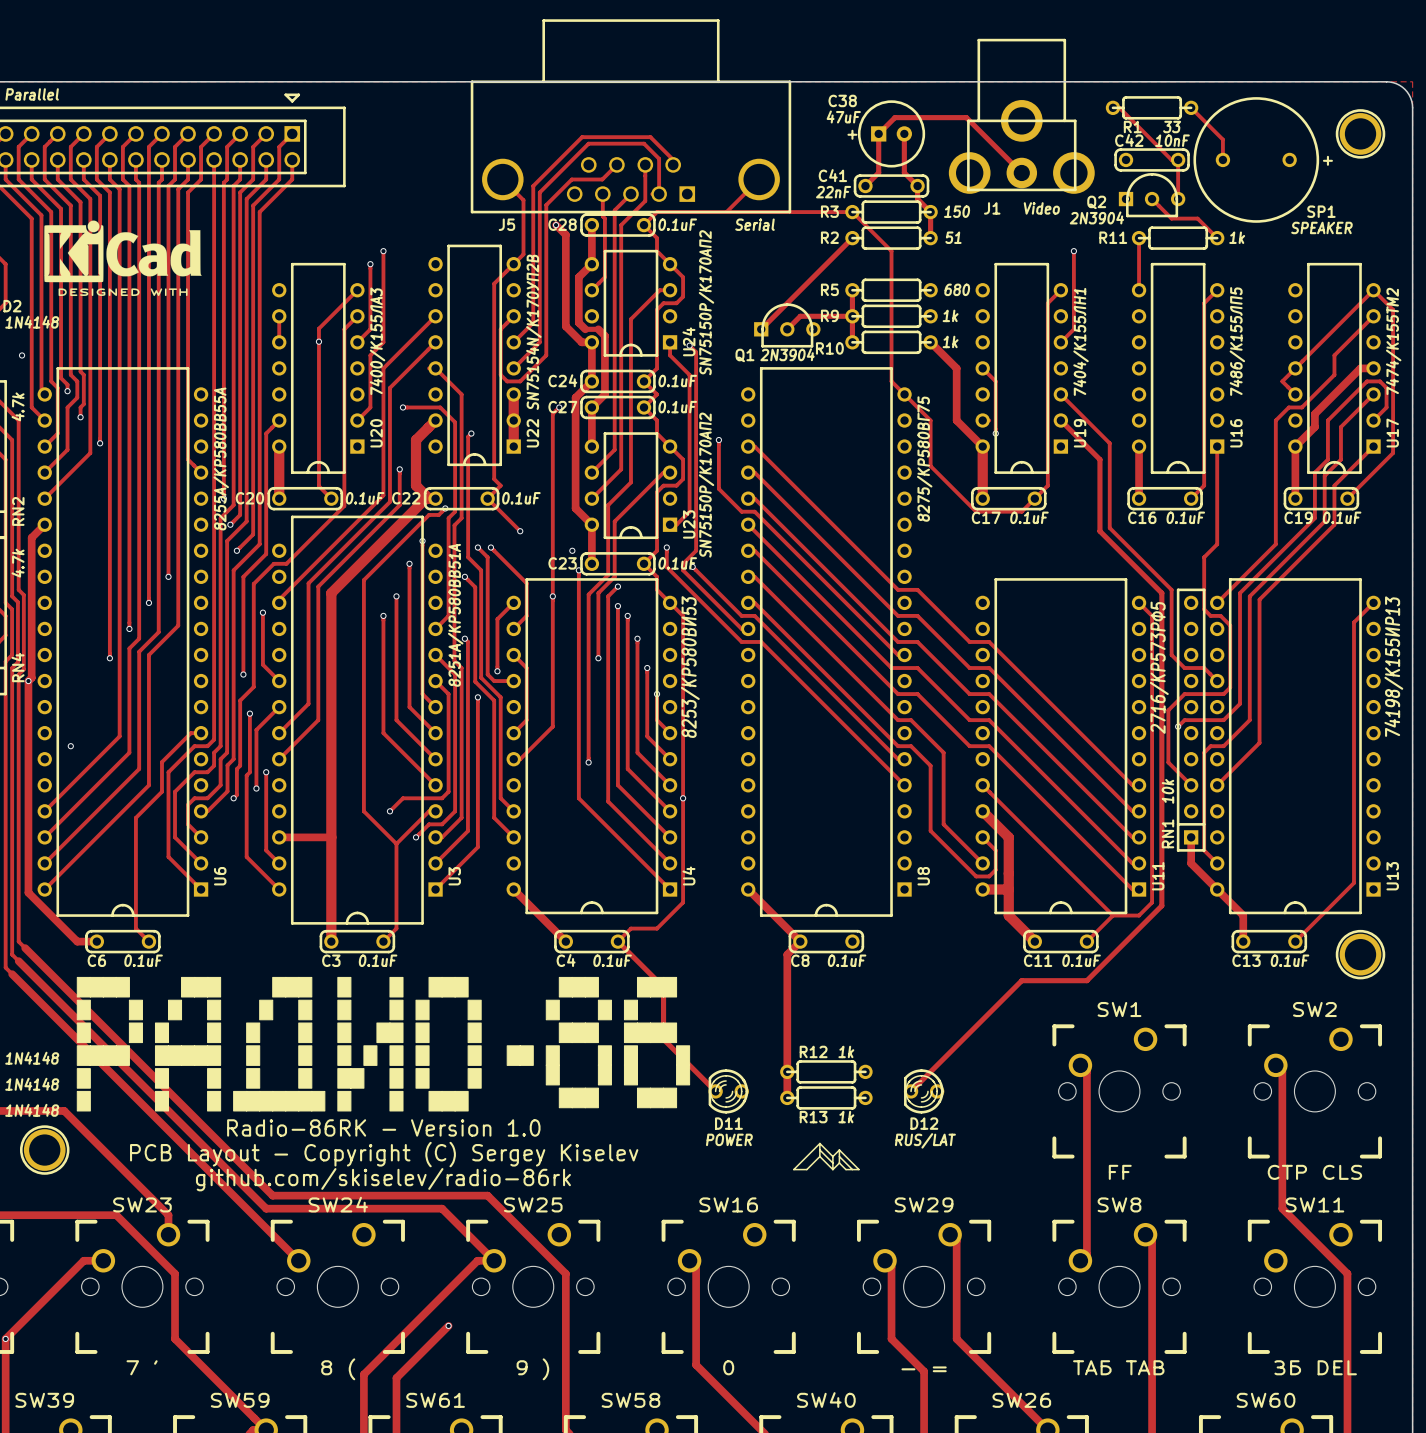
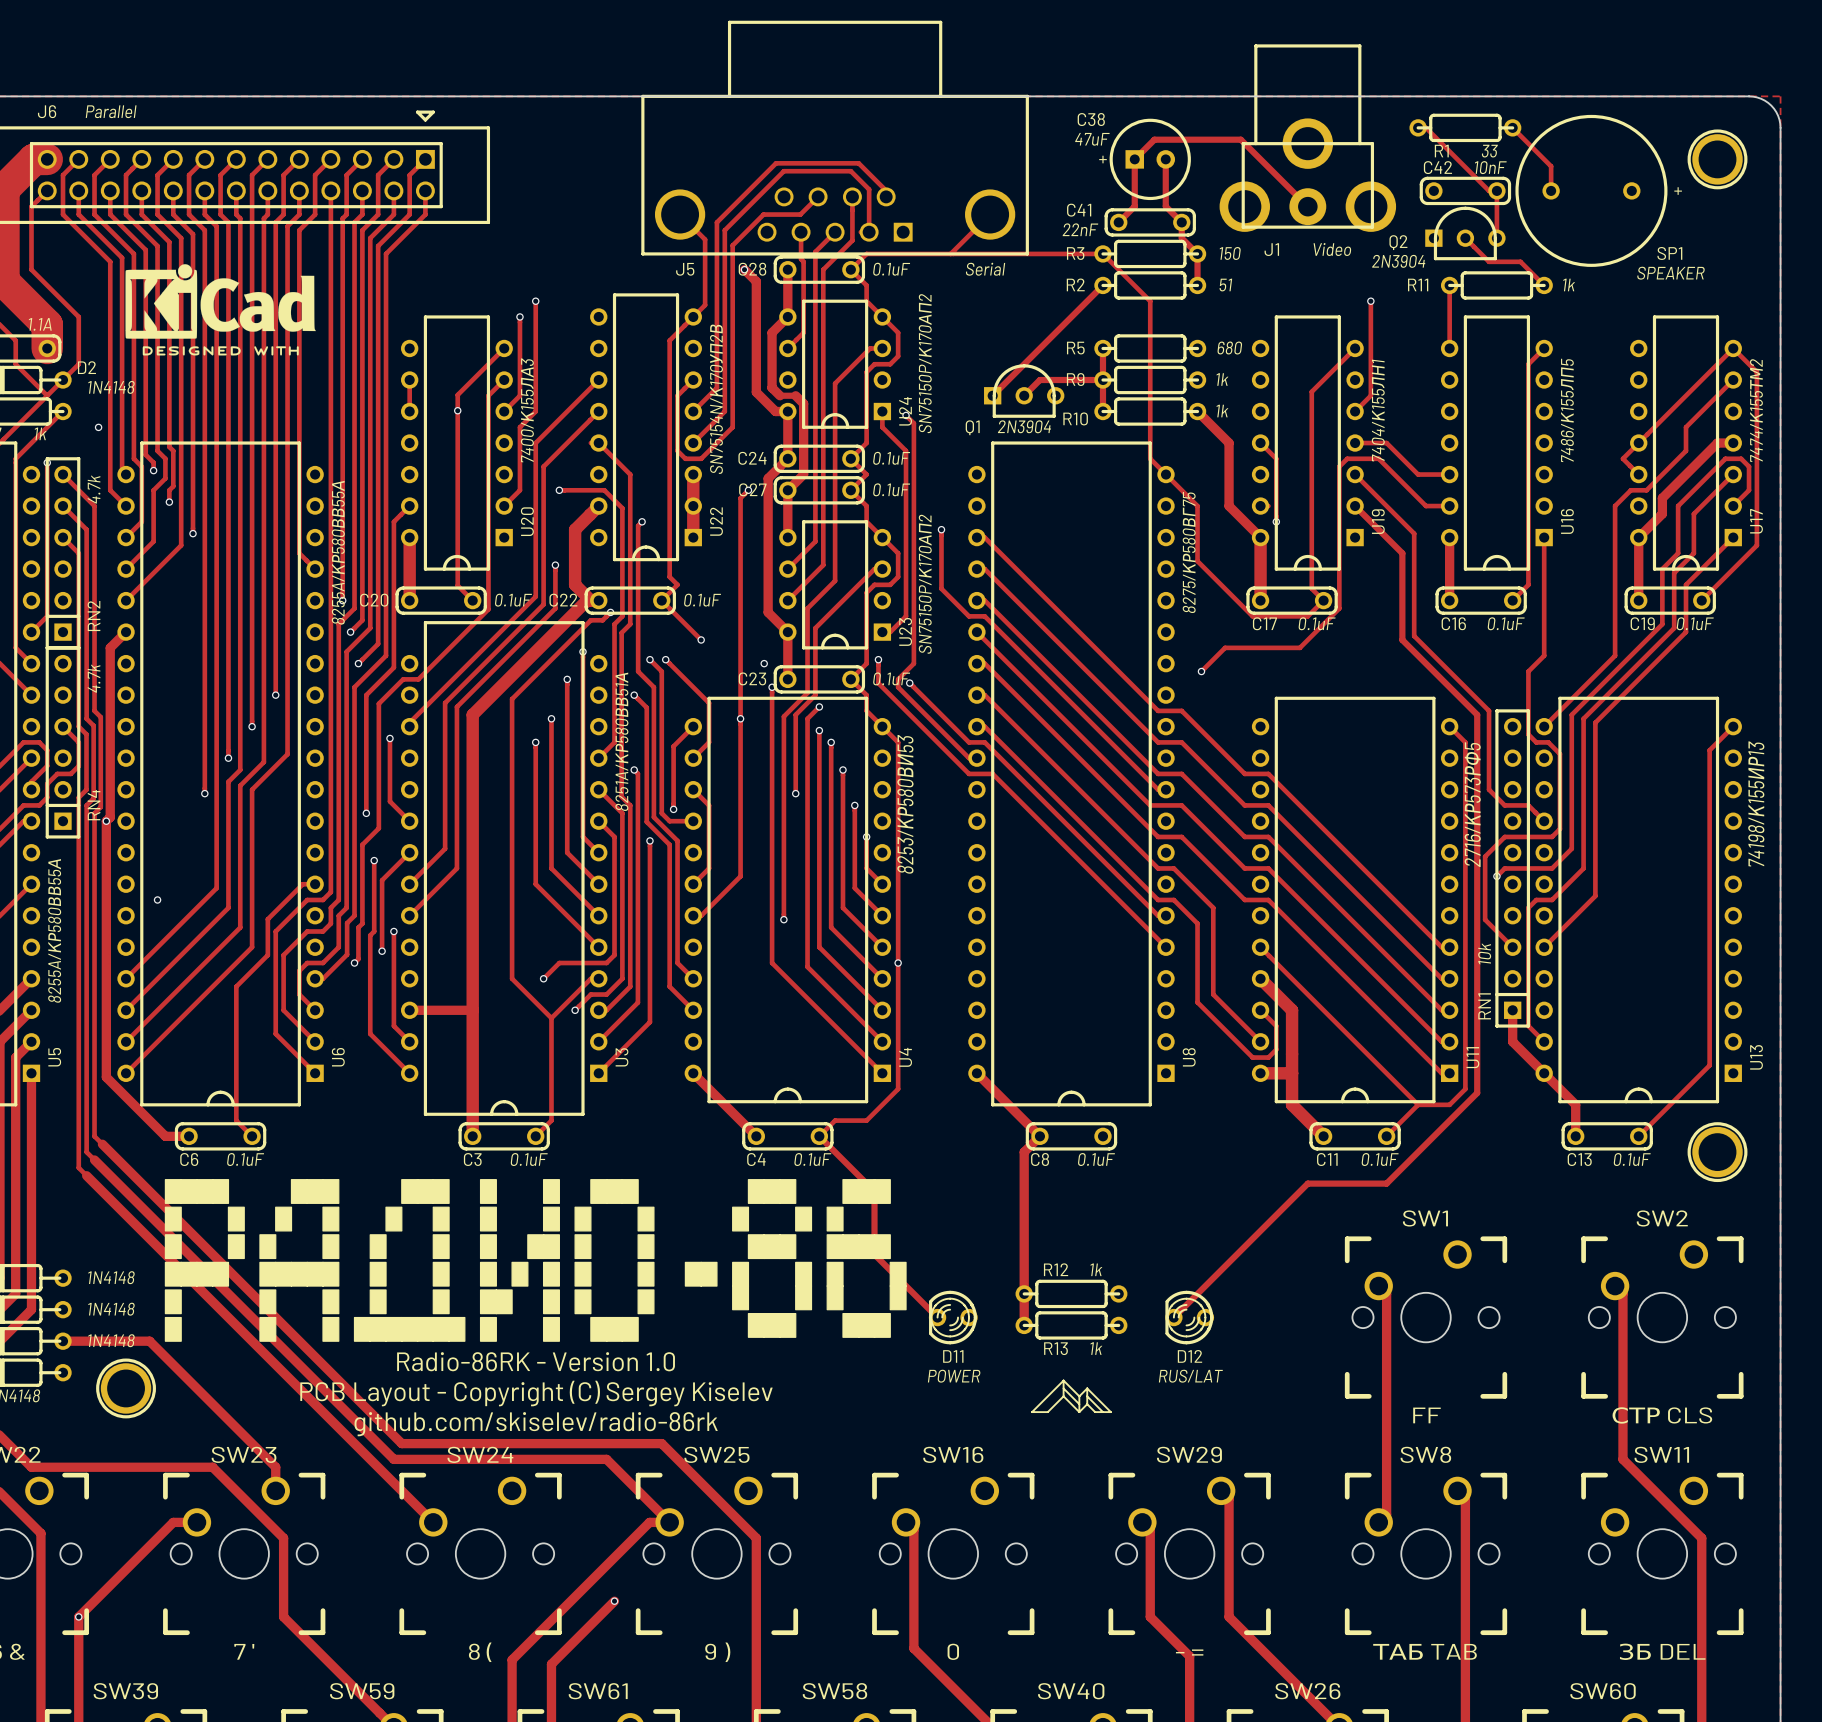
track: (1047, 303) (1047, 387) -> (1339, 364) (1311, 391) (1311, 588) (1323, 600)
track: none -> (1355, 443) (1386, 443) (1418, 474) (1449, 474)
track: none -> (1339, 466) (1347, 458) (1378, 458) (1426, 506) (1449, 506)
track: (1047, 485) (1034, 498) -> (1339, 584) (1339, 608) (1299, 647) (1225, 647) (1201, 671)
via: none -> (1201, 671)

